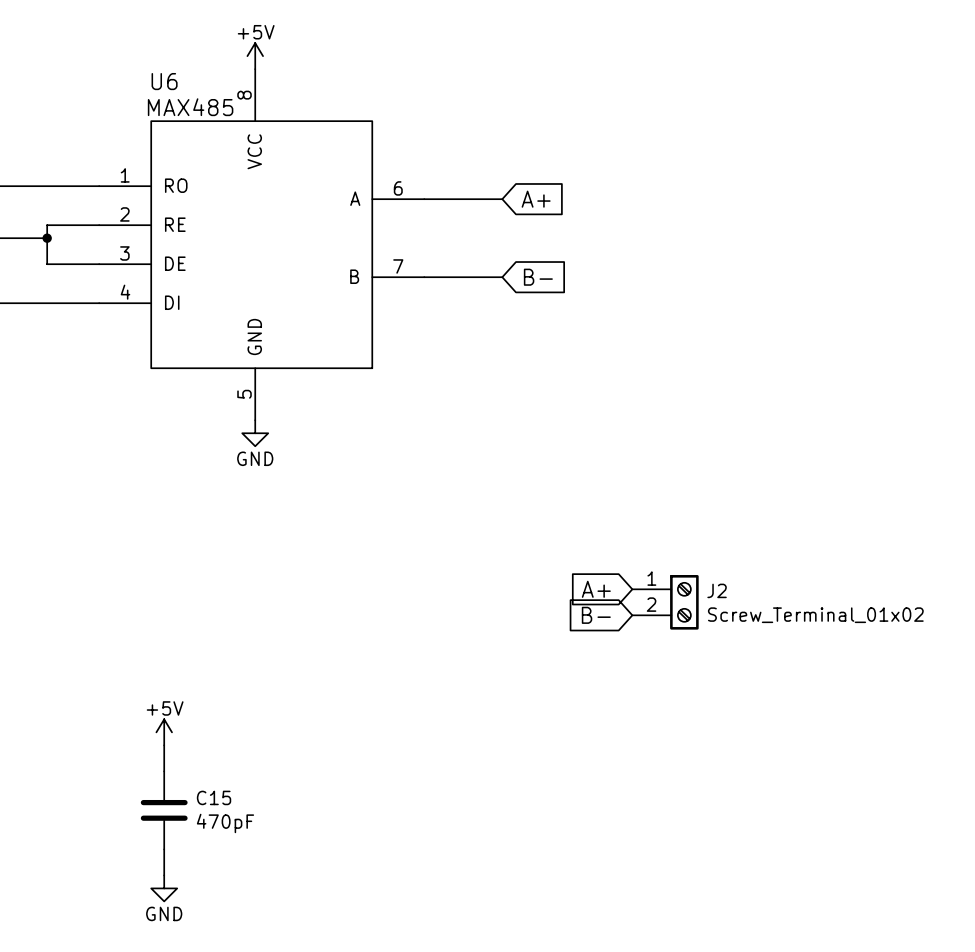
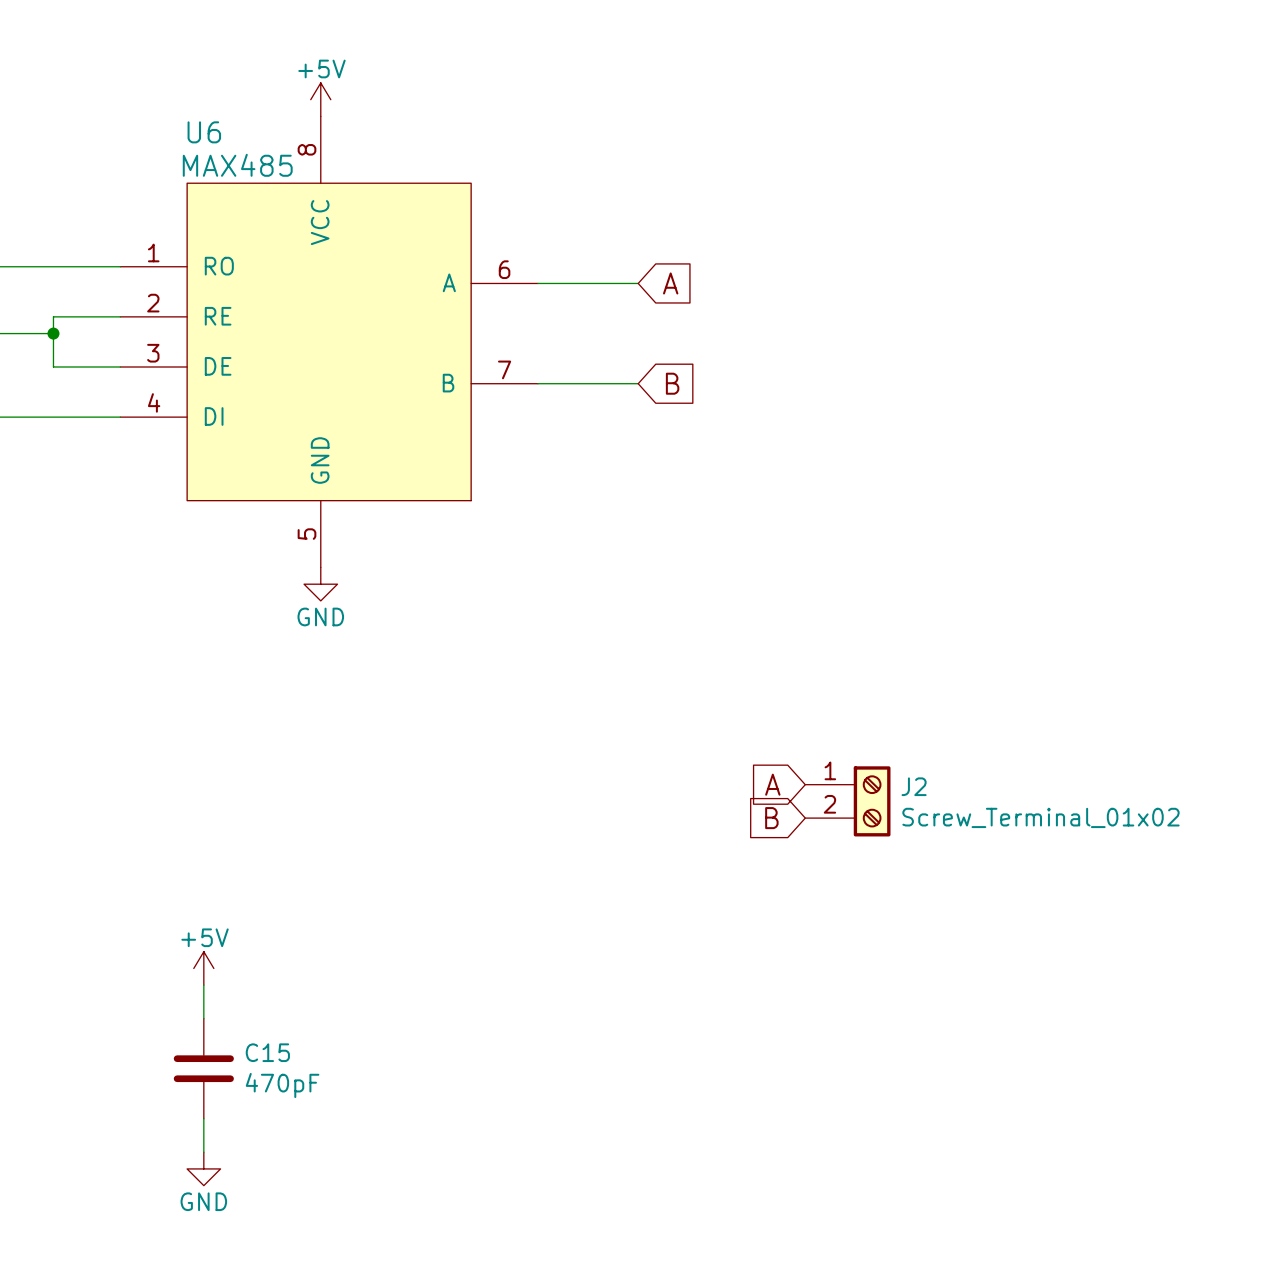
global label: A+ (536, 199) -> A (670, 283)
global label: B- (538, 277) -> B (672, 383)
global label: A+ (596, 589) -> A (772, 784)
global label: B- (596, 615) -> B (771, 818)

